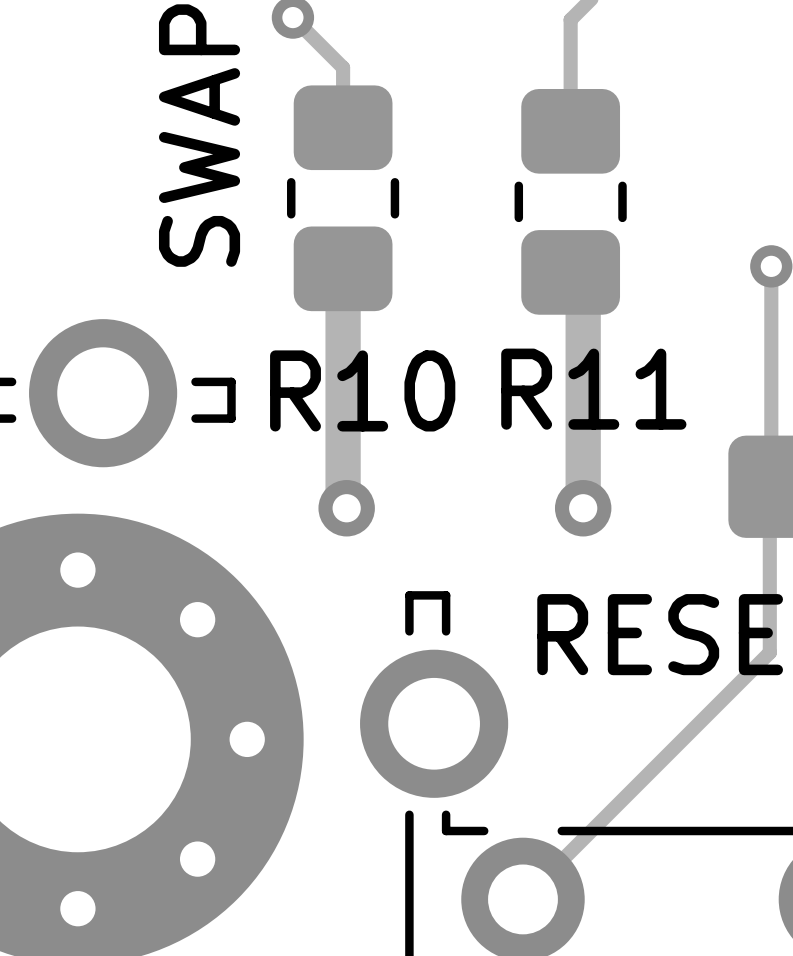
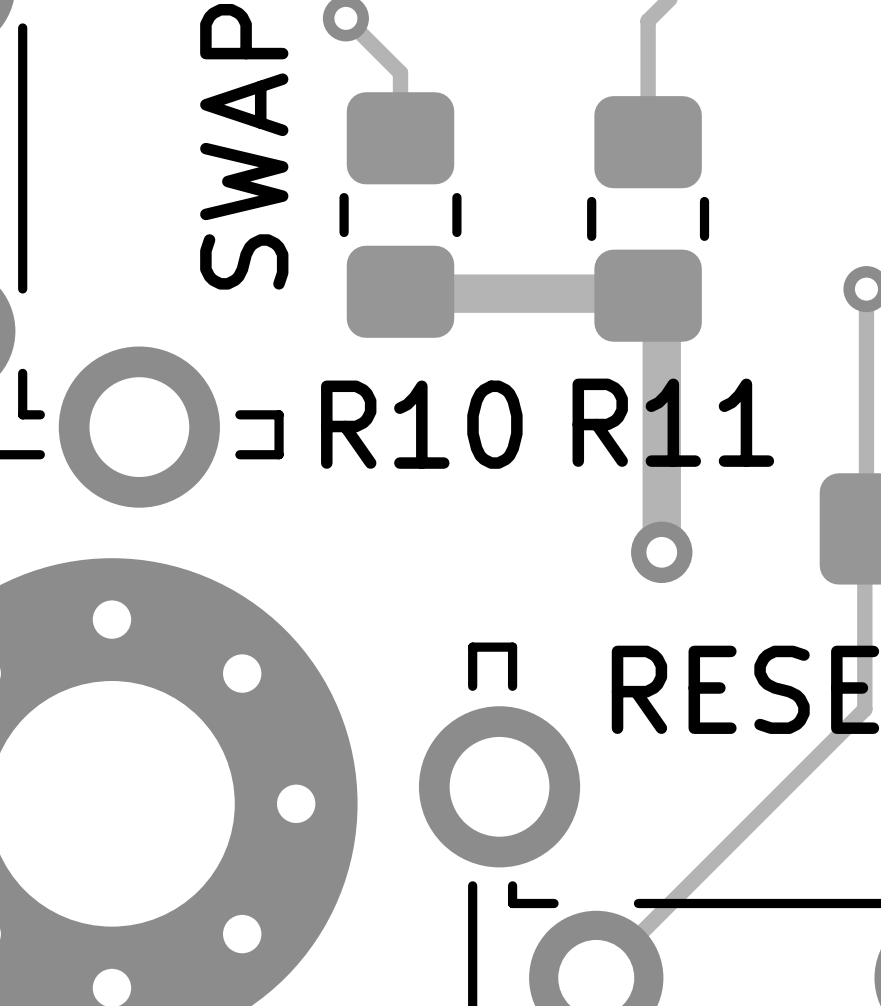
track: (343, 268) (343, 504) (346, 508) -> (400, 293) (648, 293) (661, 309)
via: (346, 508) -> none

